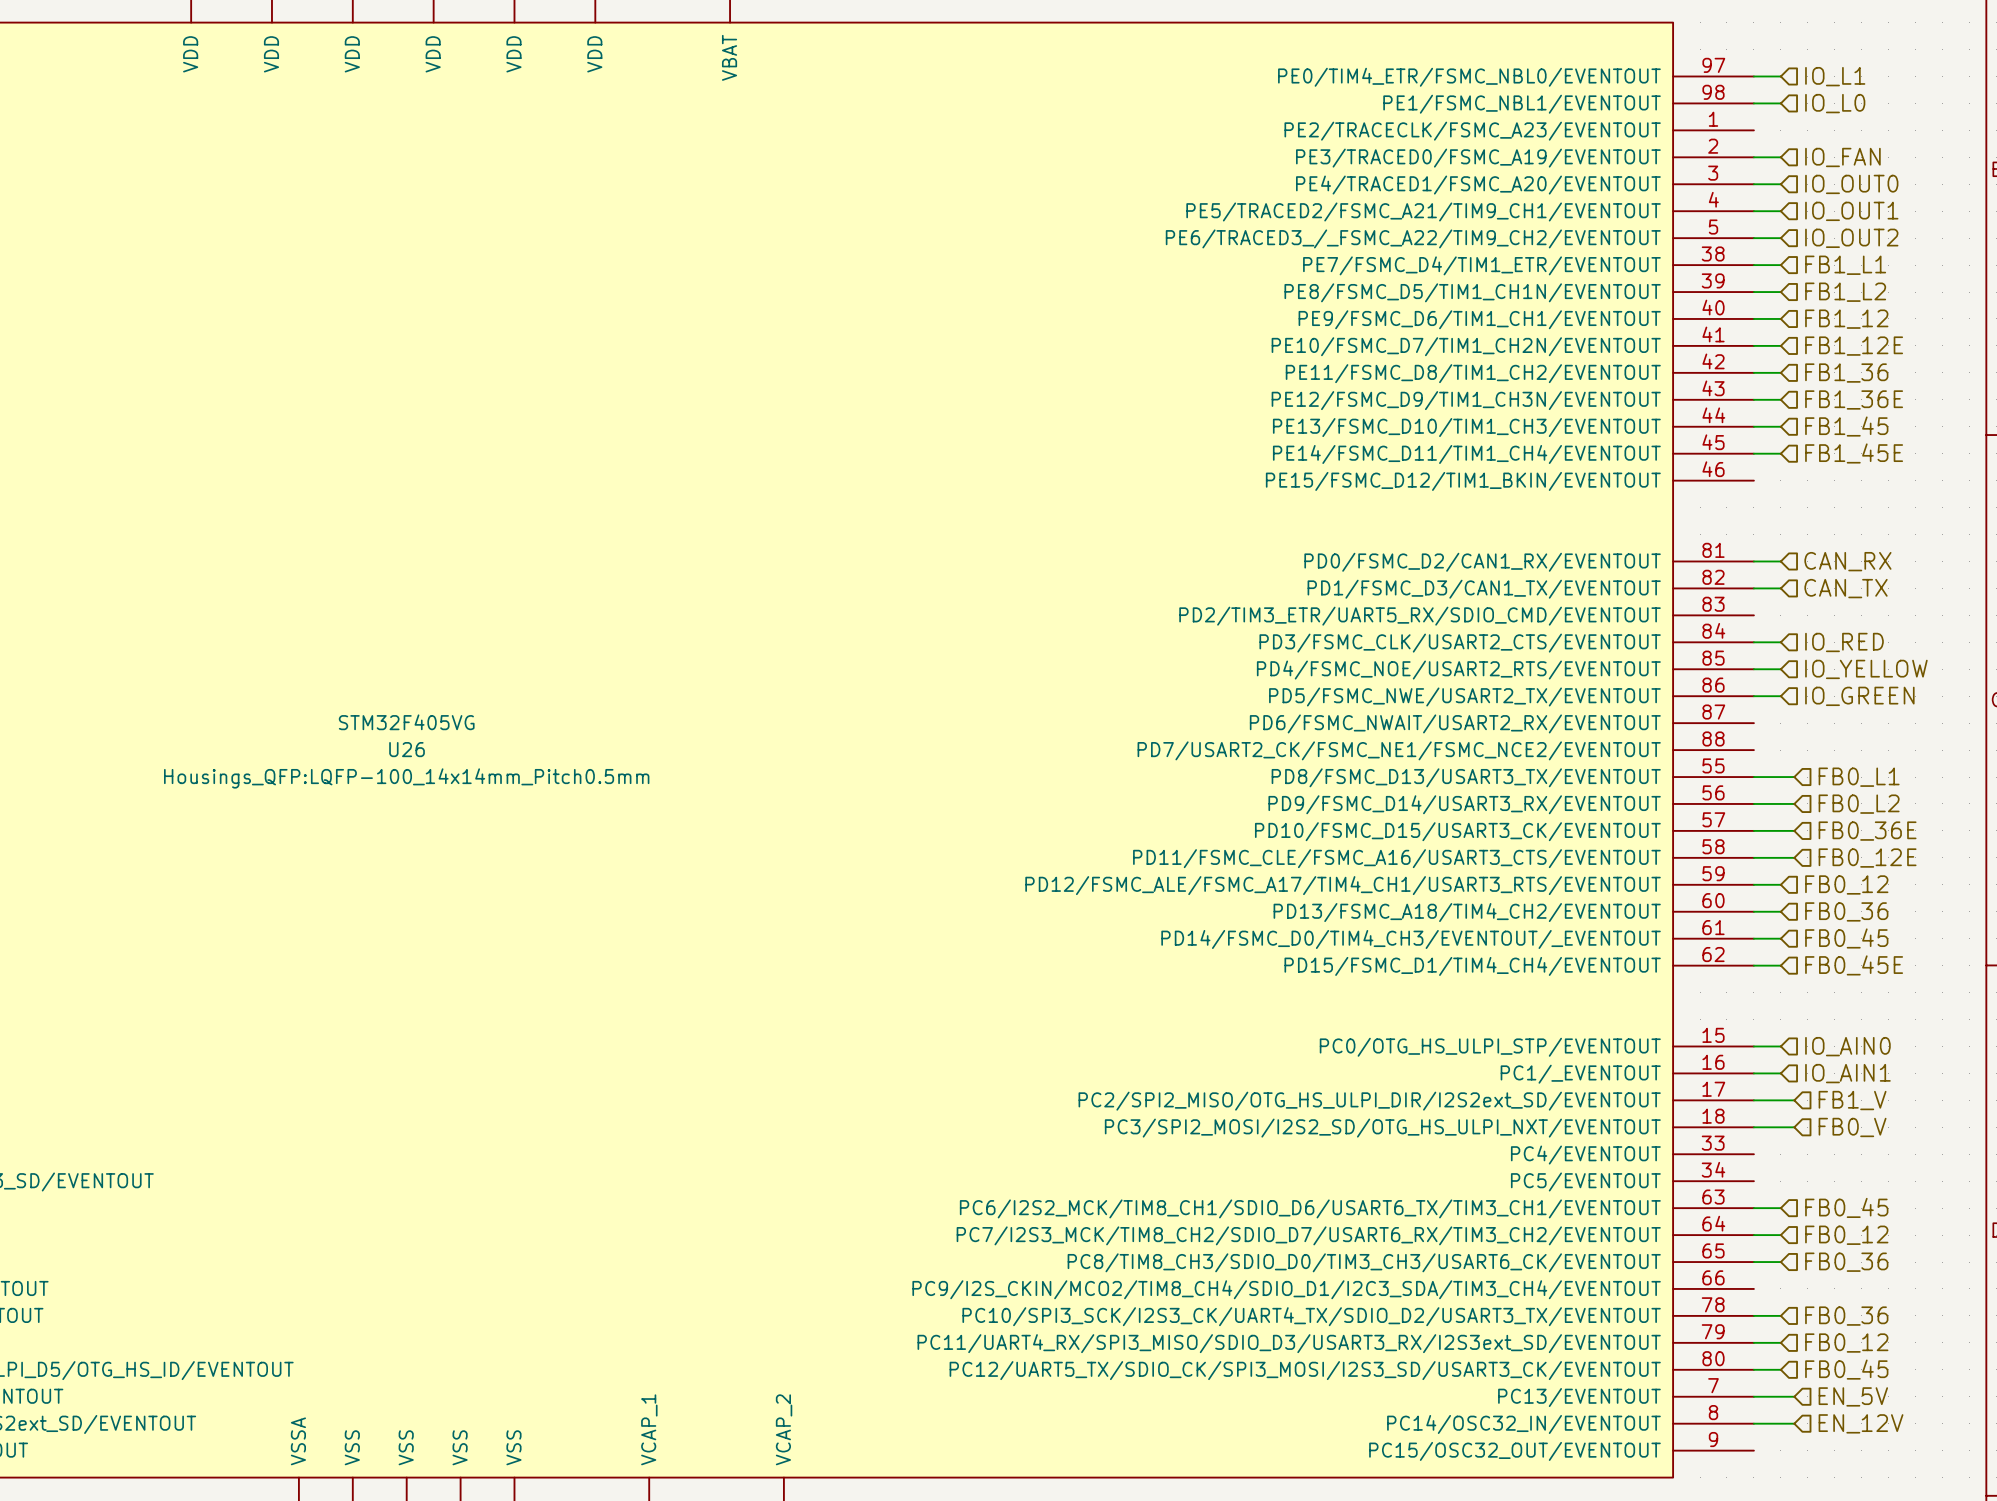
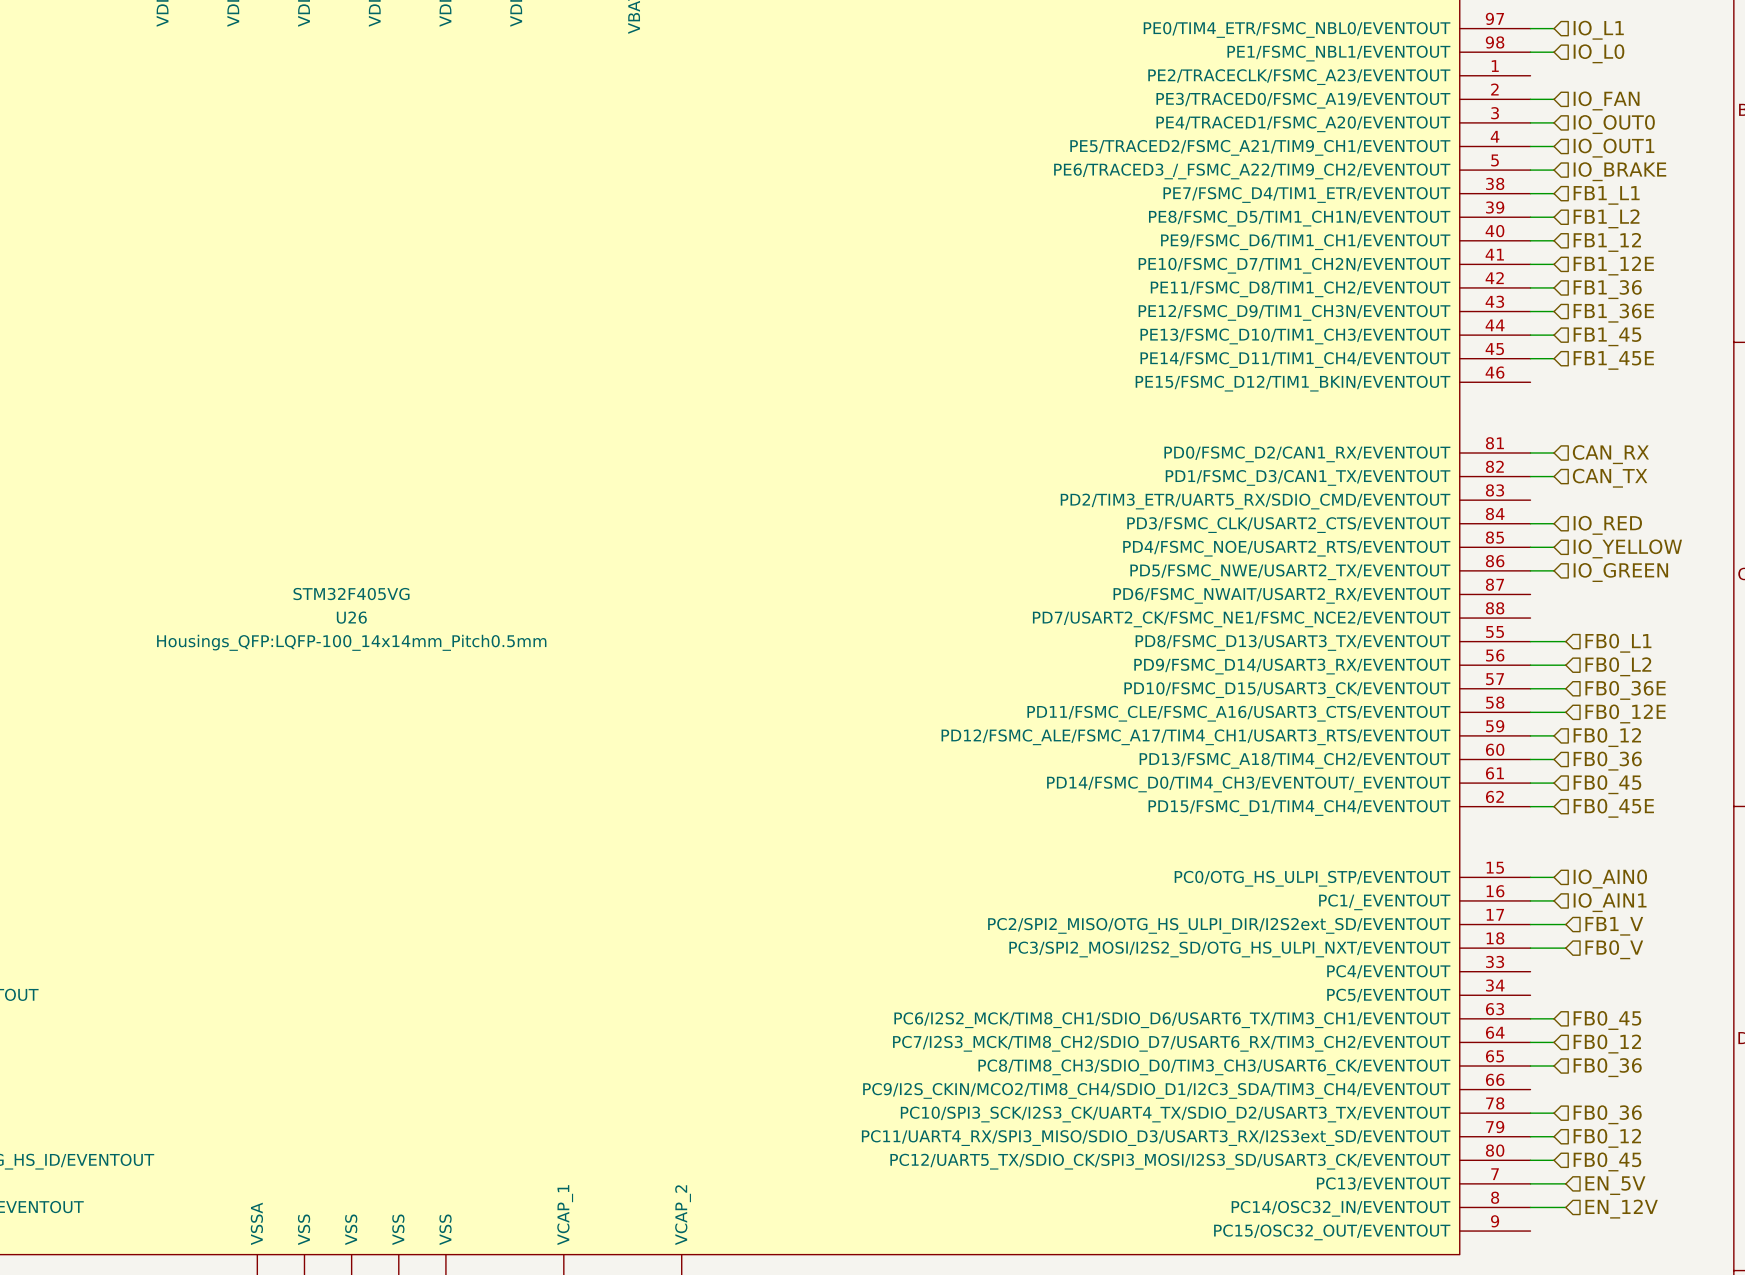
hierarchical label: IO_OUT2 (1851, 238) -> IO_BRAKE (1619, 171)

